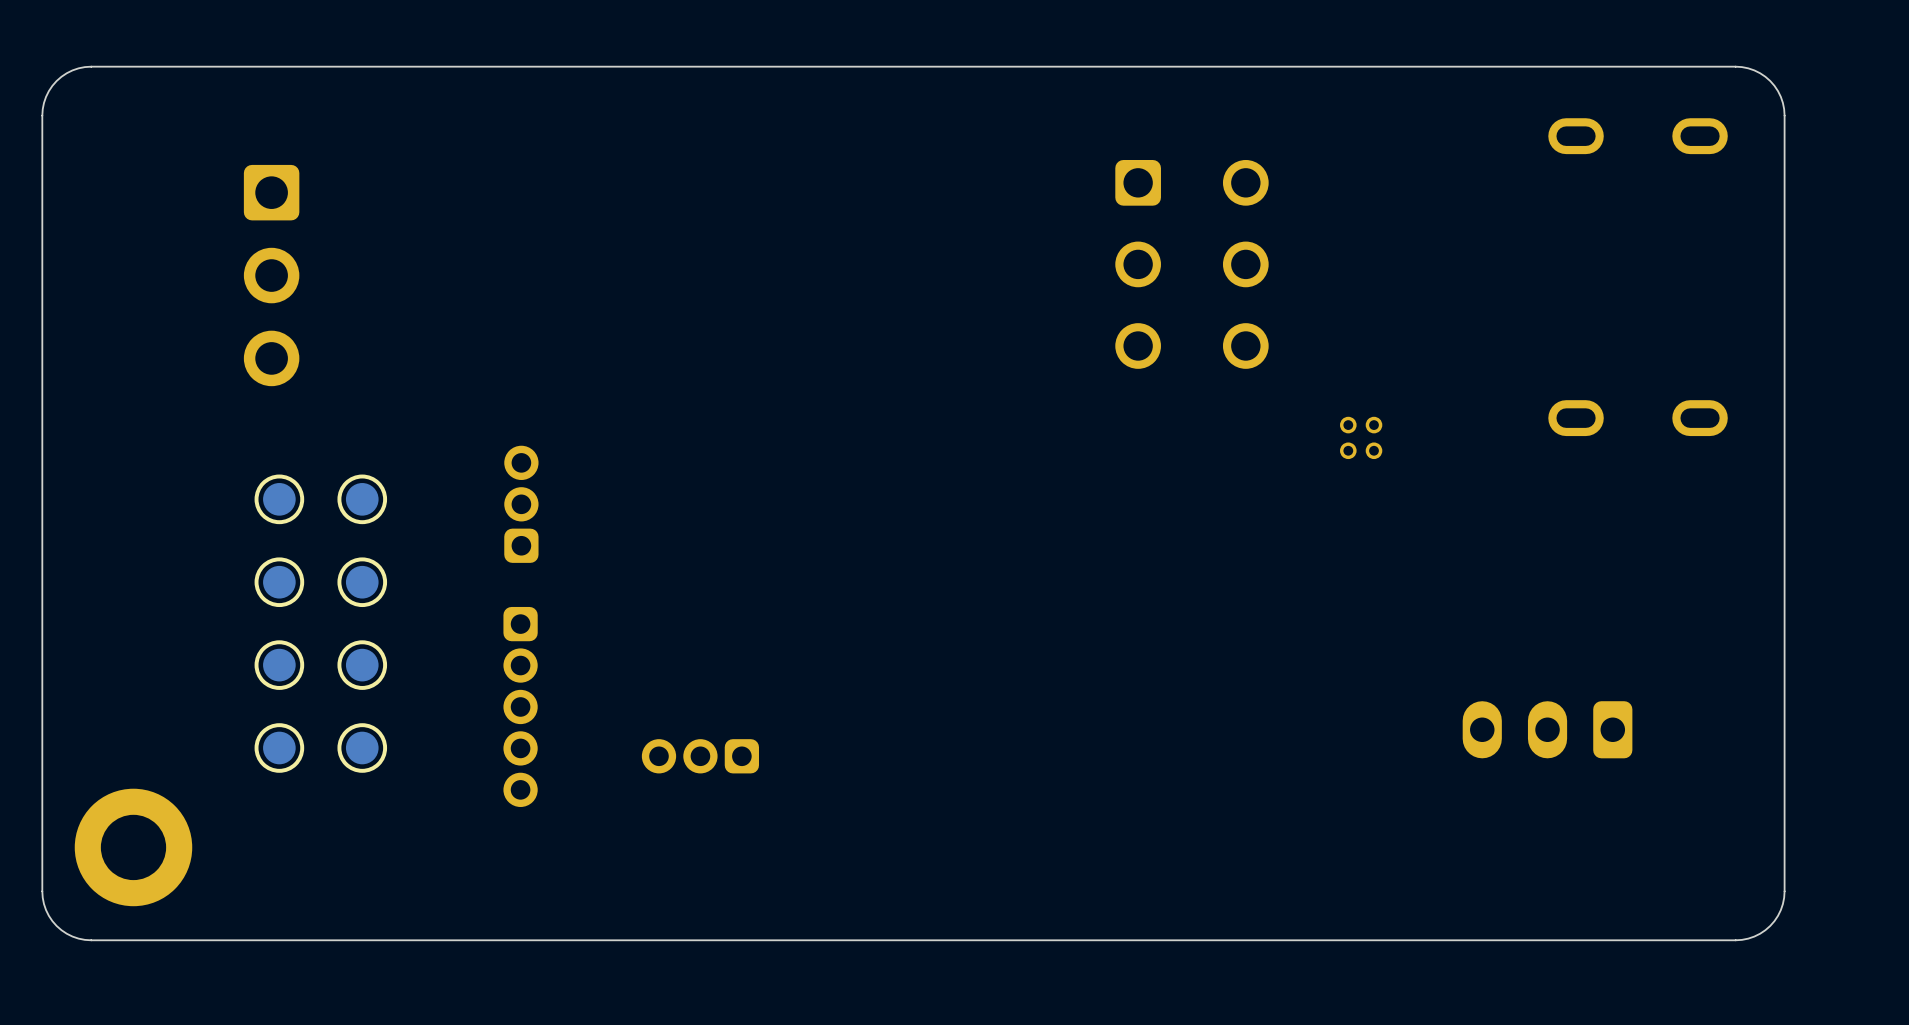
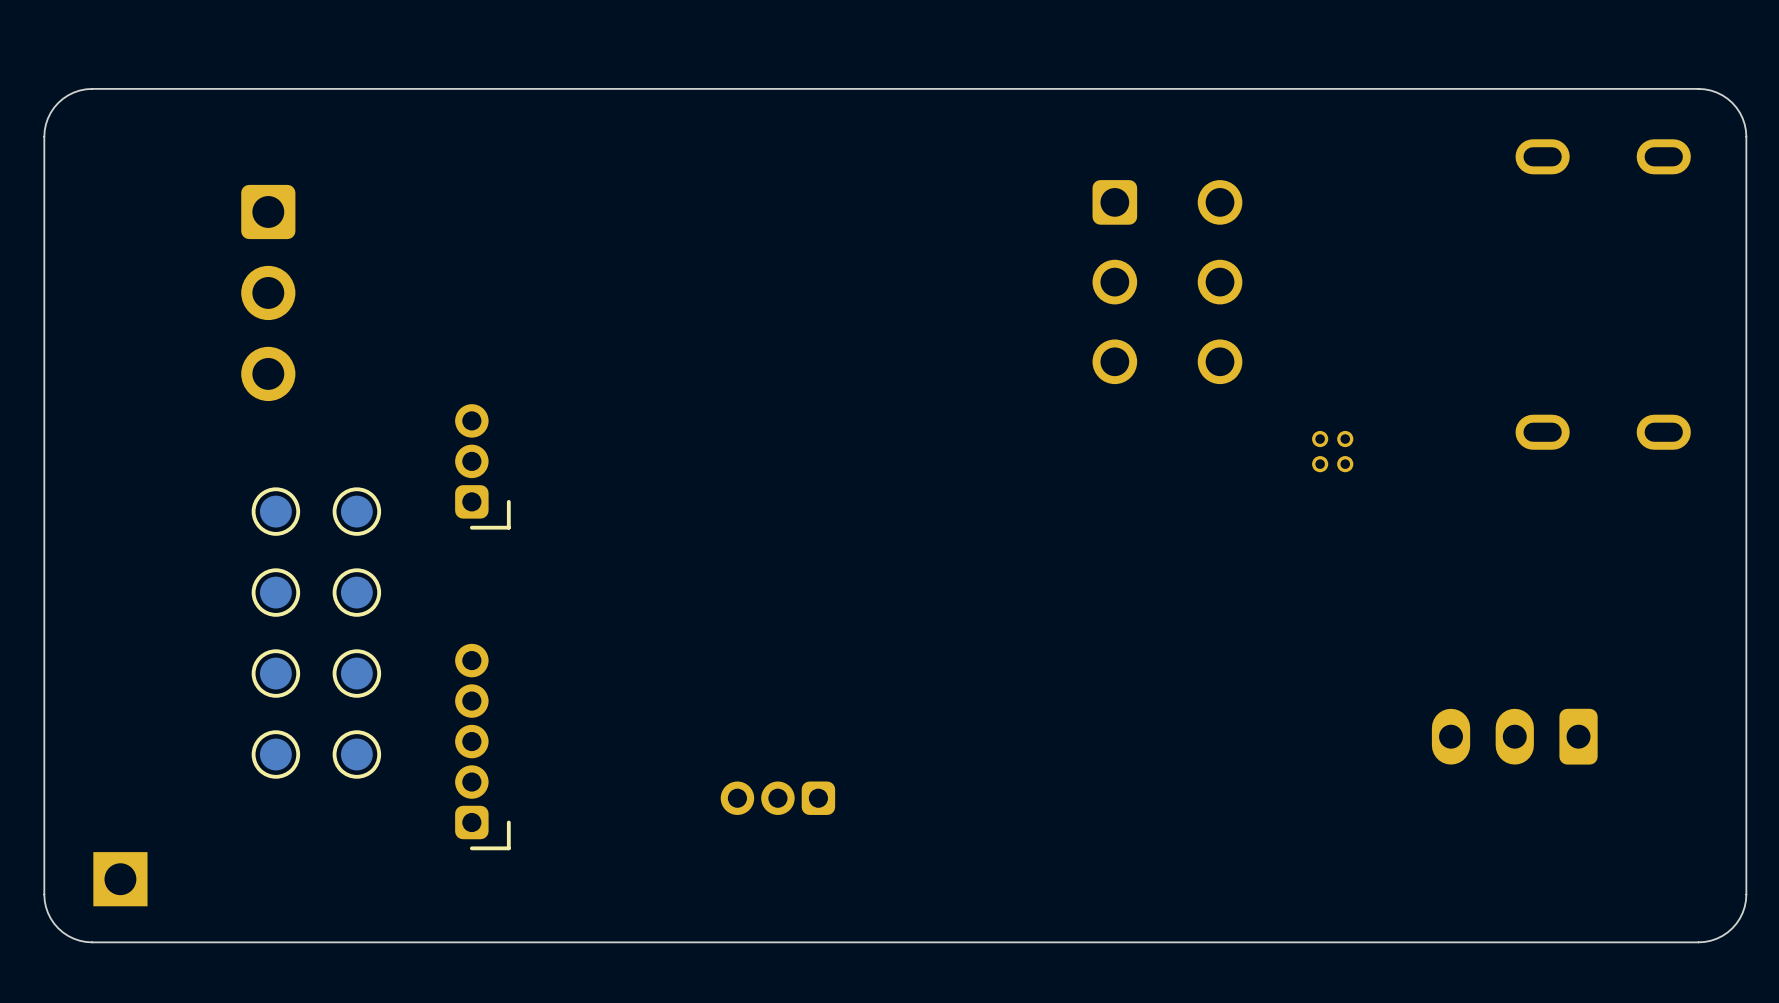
part side: top (521, 504) -> bottom (482, 466)
part side: top (520, 706) -> bottom (482, 747)
part position: (700, 756) -> (777, 798)
part footprint: [74, 788, 193, 907] -> [93, 852, 148, 907]

